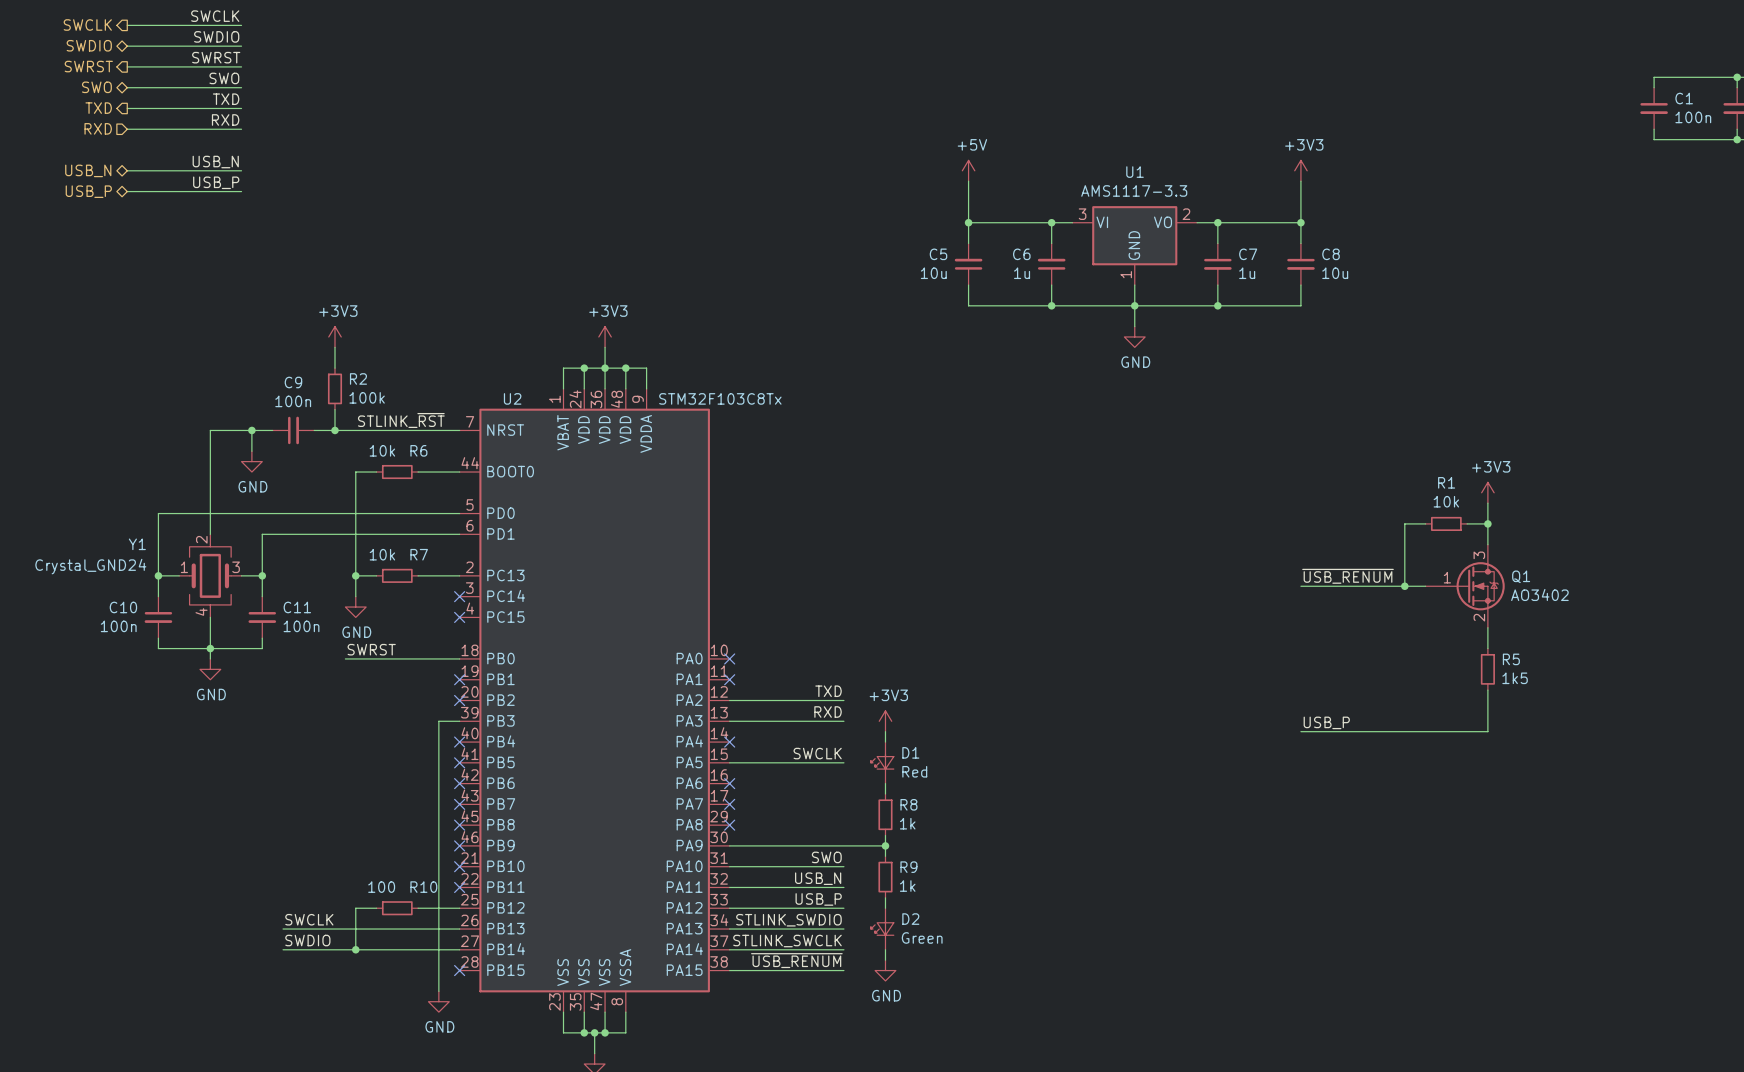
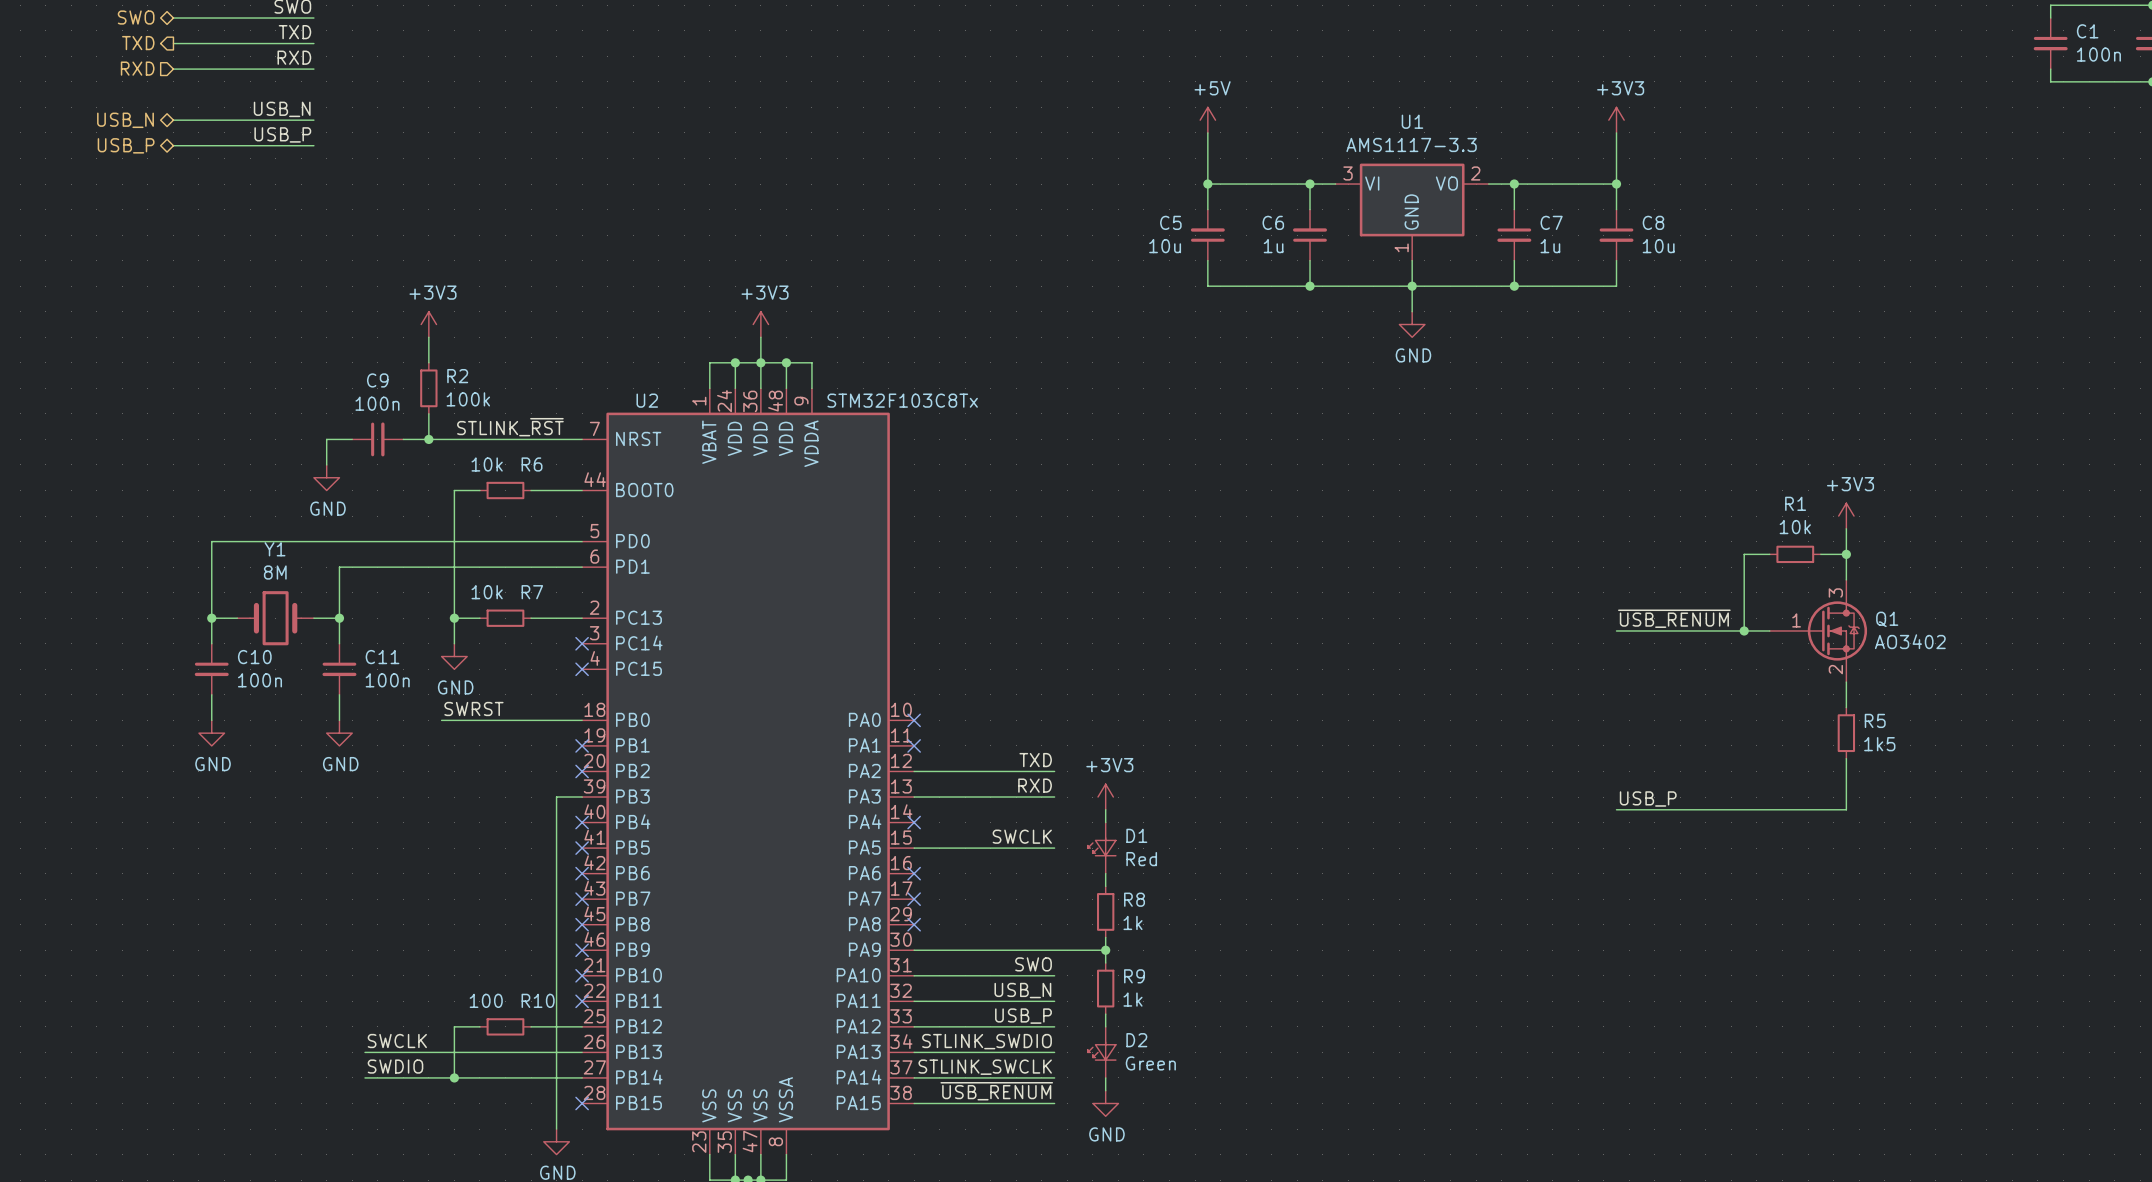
wire: (251, 430) (210, 430) (210, 534) -> none
junction: (251, 430) -> none
Y1 symbol: [179, 534, 242, 618] -> [237, 591, 314, 646]
Y1 name position: Y1 (137, 544) -> Y1 (275, 549)
Y1 value: Crystal_GND24 (90, 566) -> 8M (275, 572)
C10 name position: C10 (123, 607) -> C10 (254, 657)
wire: (210, 617) (210, 658) -> none
C10 value position: 100n (118, 626) -> 100n (259, 680)
wire: (158, 648) (262, 648) -> (211, 707) (211, 720)
junction: (210, 648) -> none
wire: none -> (339, 707) (339, 720)
power symbol: none -> GND (211, 733)
power symbol: GND (210, 669) -> none
power symbol: none -> GND (339, 733)

